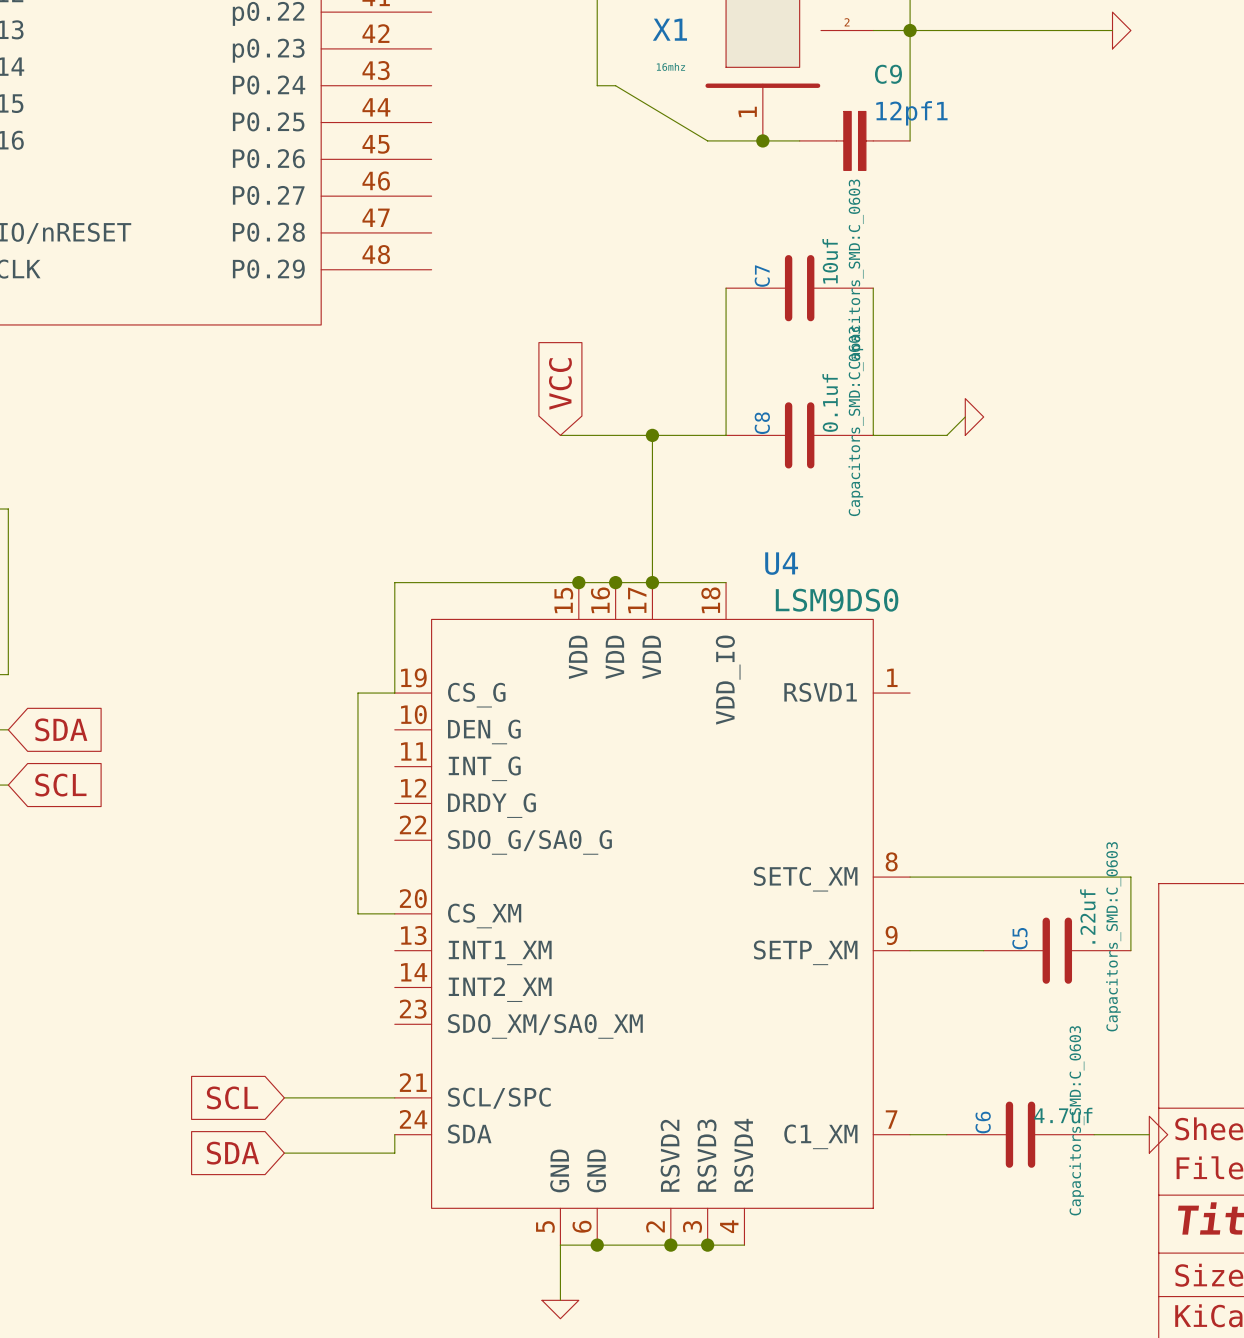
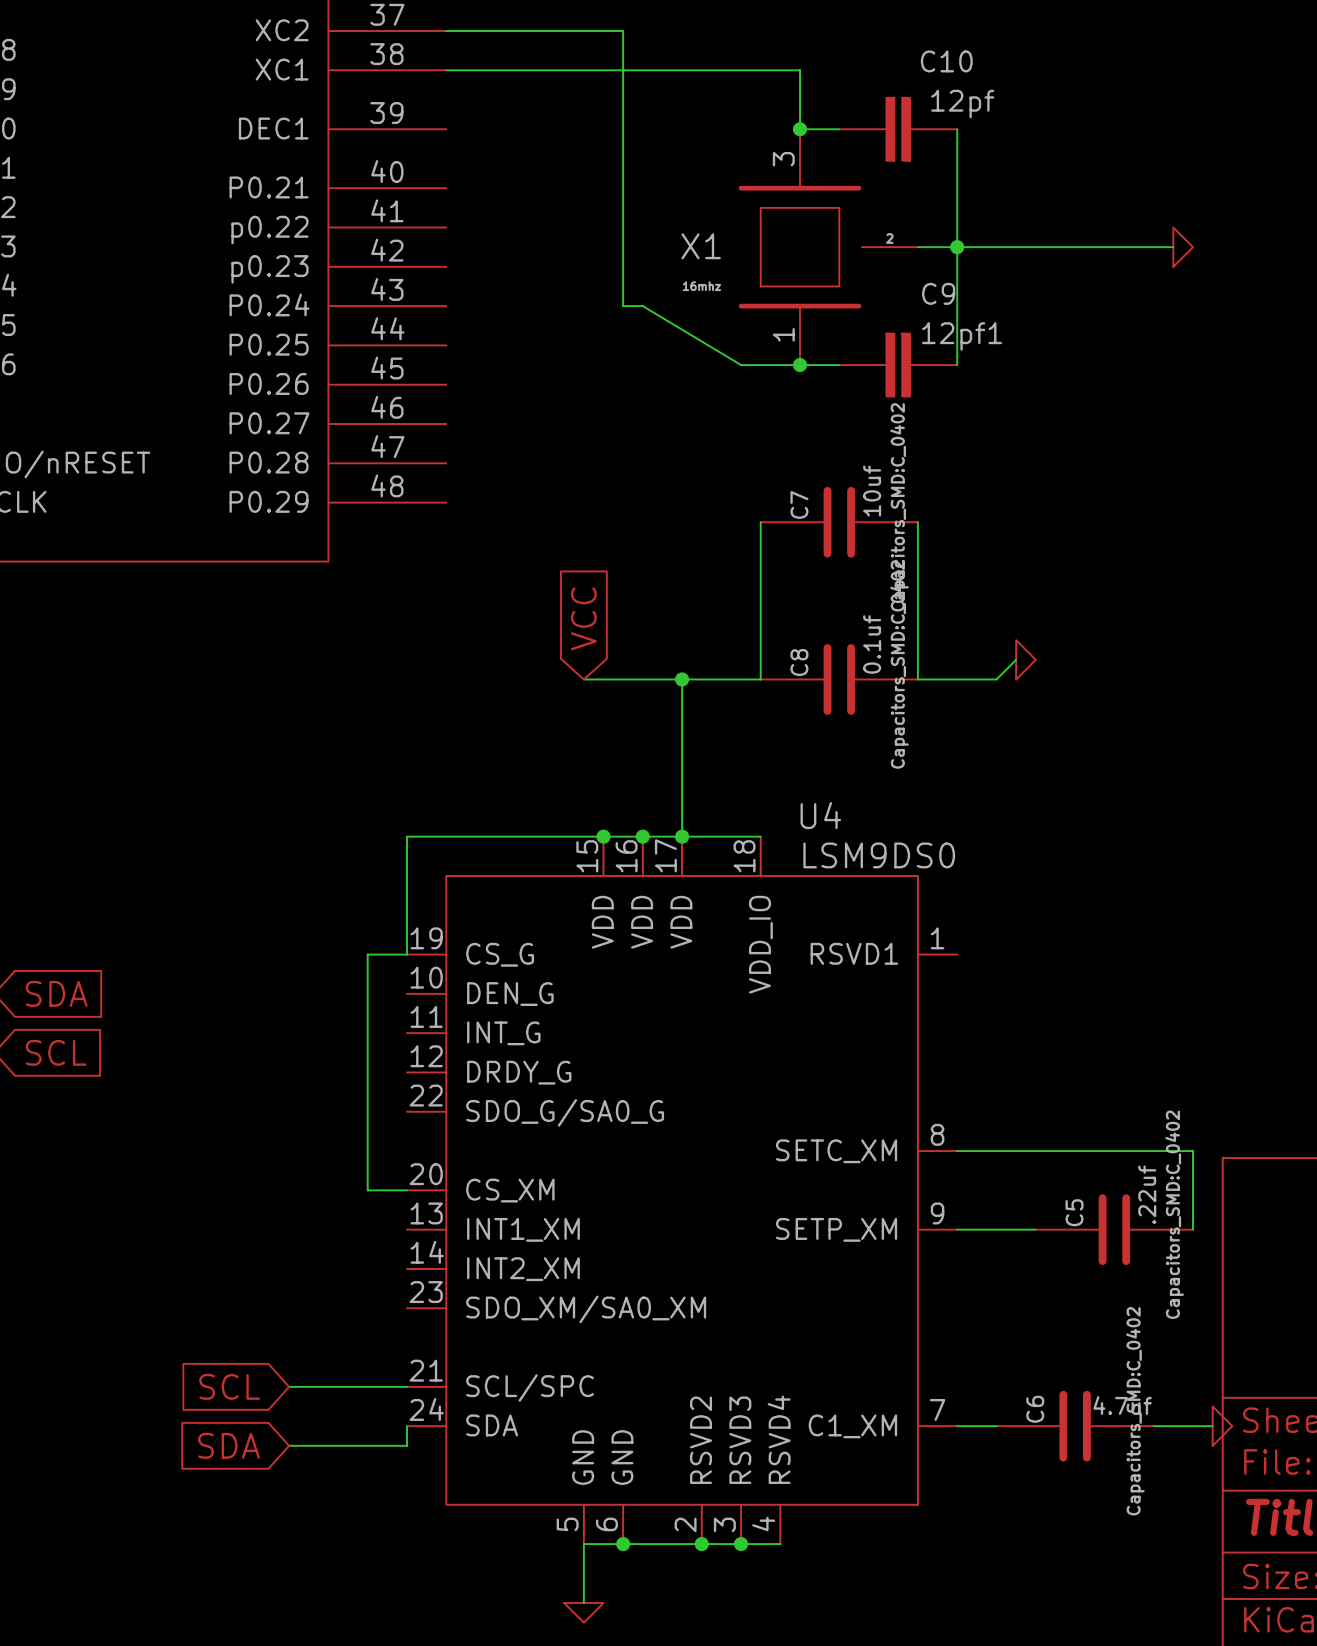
C7 text: Capacitors_SMD:C_0603 (856, 274) -> Capacitors_SMD:C_0402 (899, 507)
C8 text: Capacitors_SMD:C_0603 (856, 421) -> Capacitors_SMD:C_0402 (899, 664)
C5 text: Capacitors_SMD:C_0603 (1113, 936) -> Capacitors_SMD:C_0402 (1174, 1214)
C6 text: Capacitors_SMD:C_0603 (1076, 1120) -> Capacitors_SMD:C_0402 (1135, 1411)

